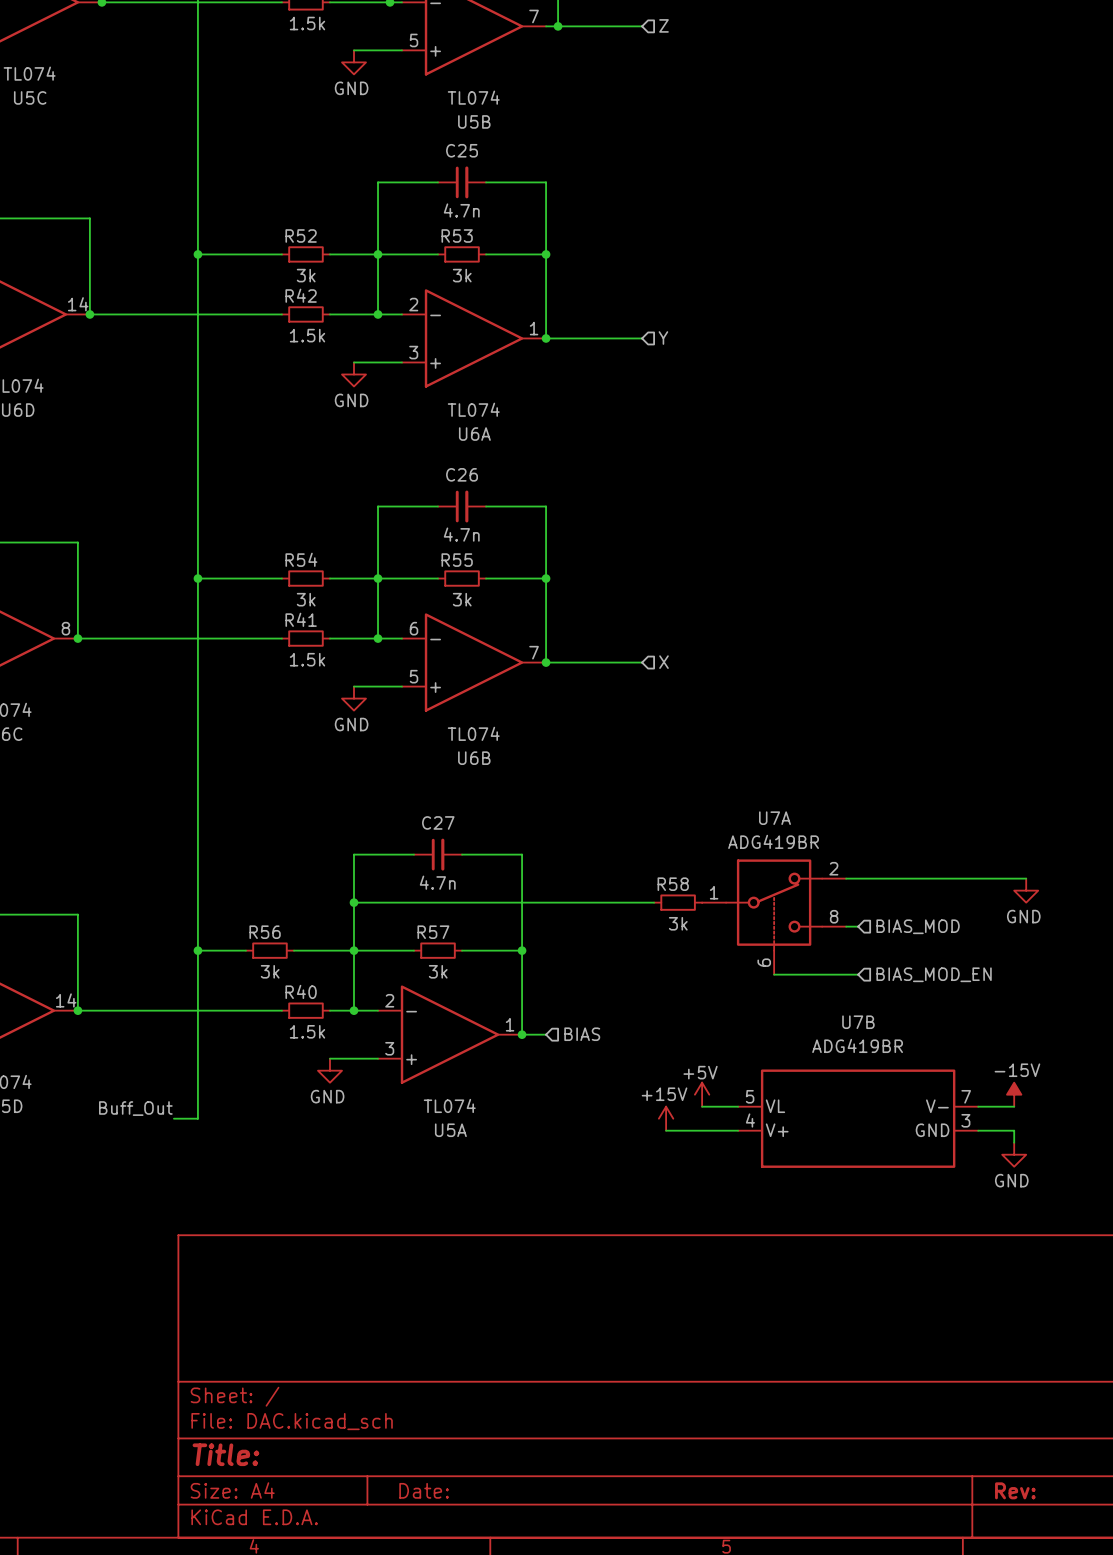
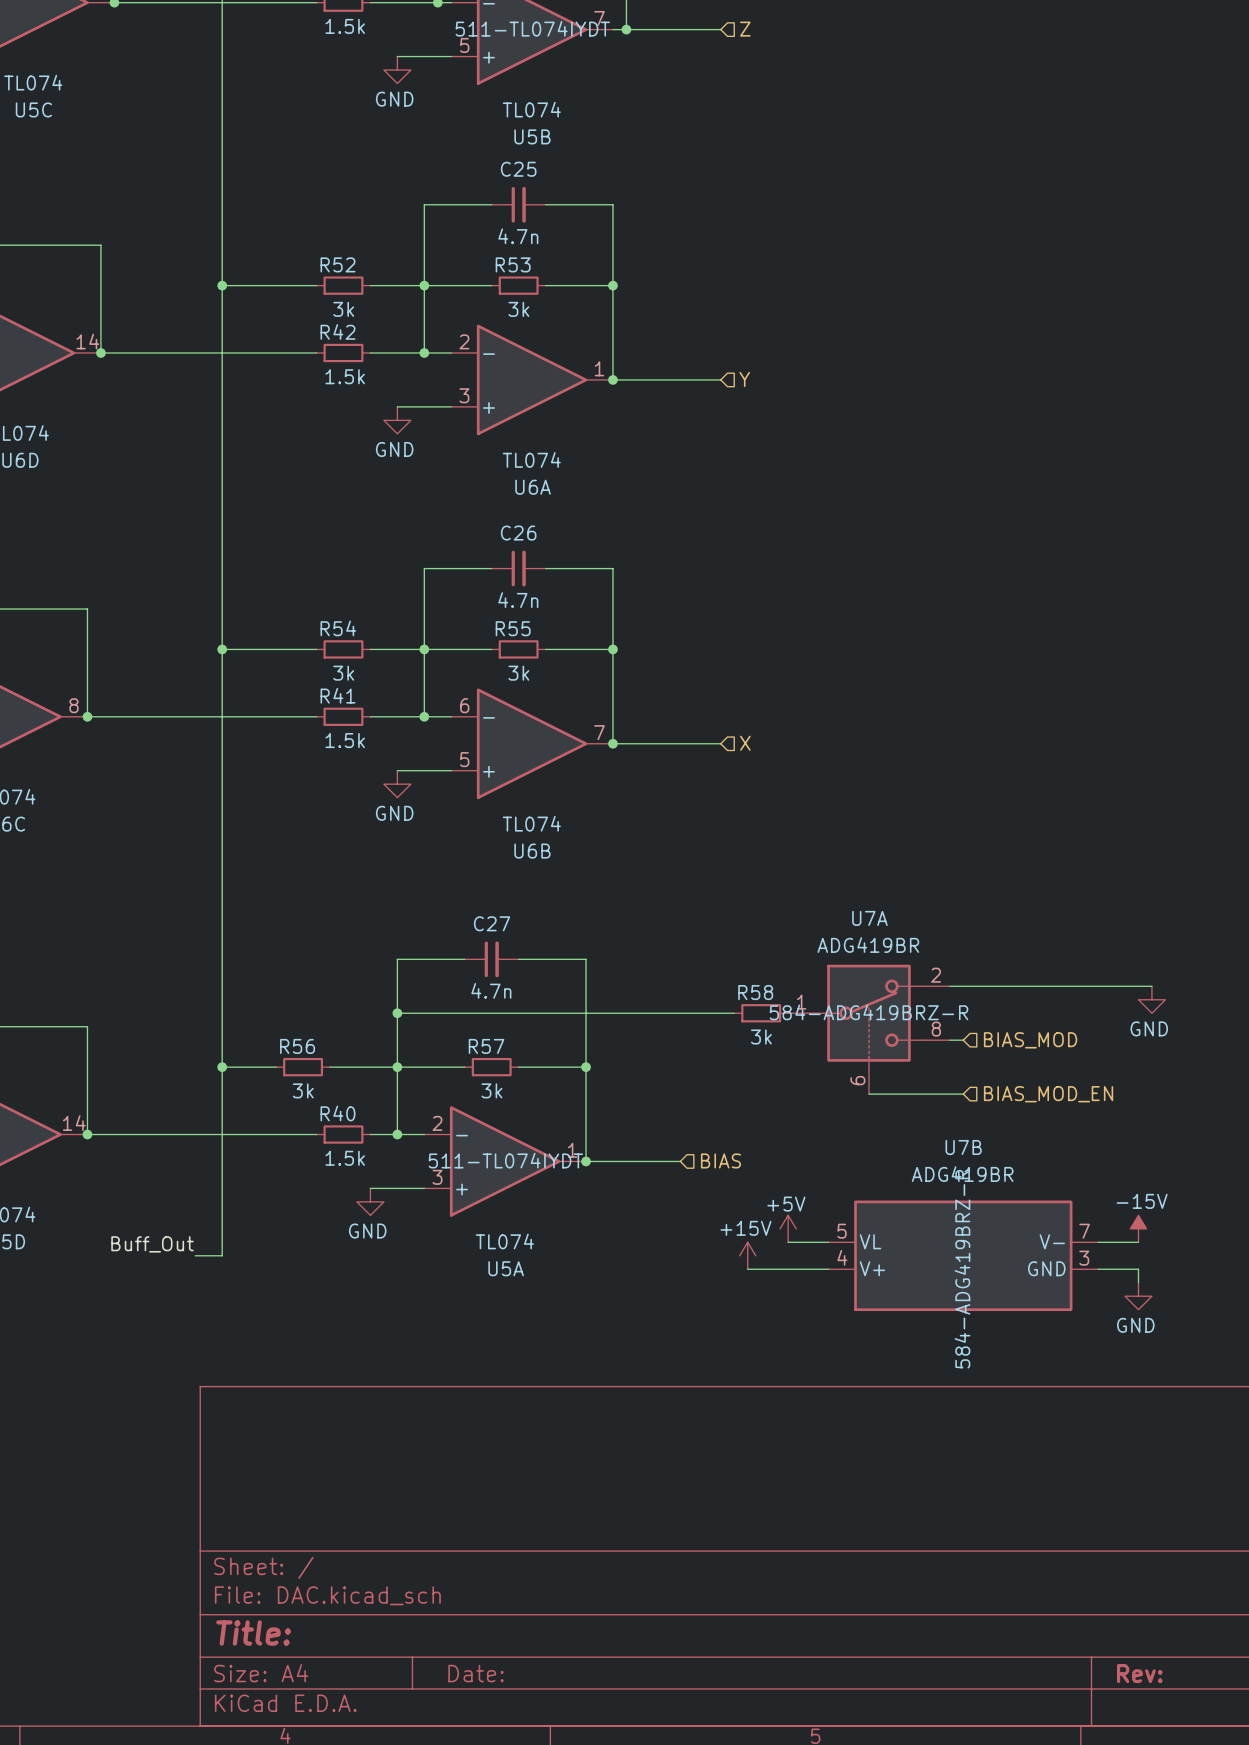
U5B text: none -> 511-TL074IYDT (532, 28)
U7A text: none -> 584-ADG419BRZ-R (868, 1012)
U5A text: none -> 511-TL074IYDT (505, 1160)
wire: none -> (612, 1161) (680, 1161)
hierarchical label position: BIAS (582, 1034) -> BIAS (720, 1160)
U7B text: none -> 584-ADG419BRZ-R (962, 1269)

